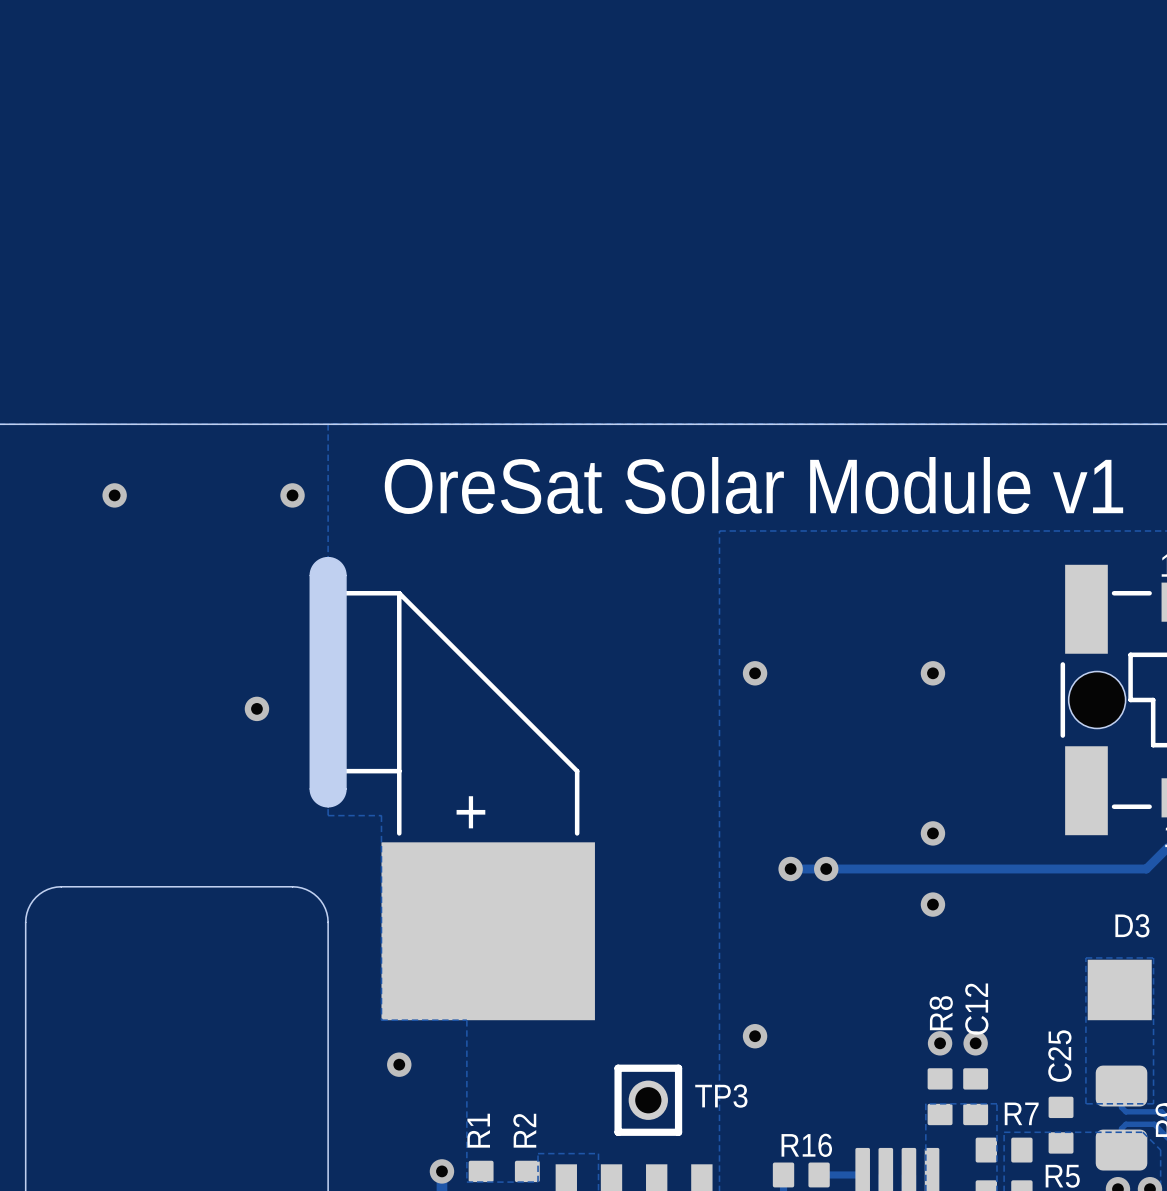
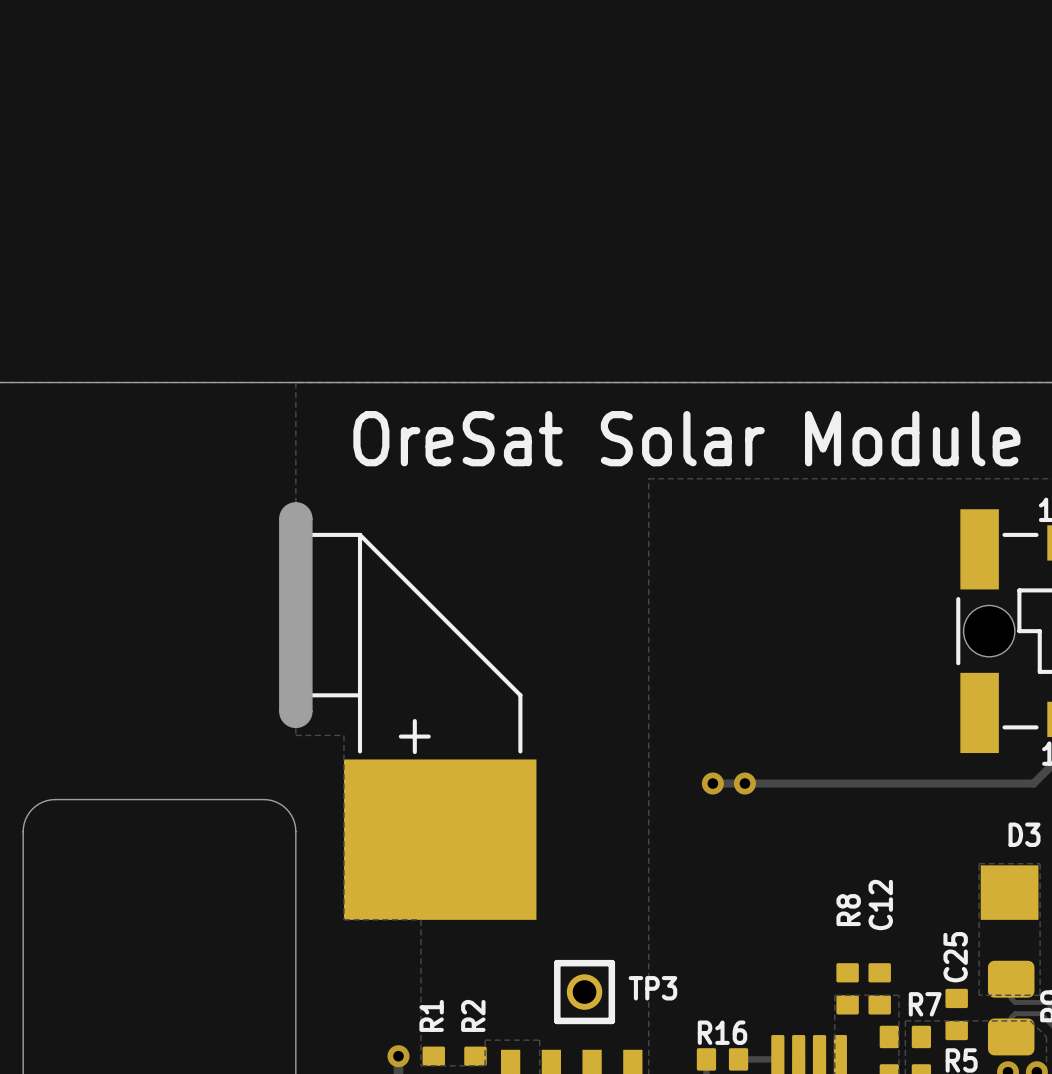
via: (114, 495) -> none
via: (292, 495) -> none
via: (755, 673) -> none
via: (932, 673) -> none
via: (256, 708) -> none
via: (932, 833) -> none
via: (932, 904) -> none
via: (755, 1036) -> none
via: (940, 1043) -> none
via: (975, 1043) -> none
via: (399, 1064) -> none

